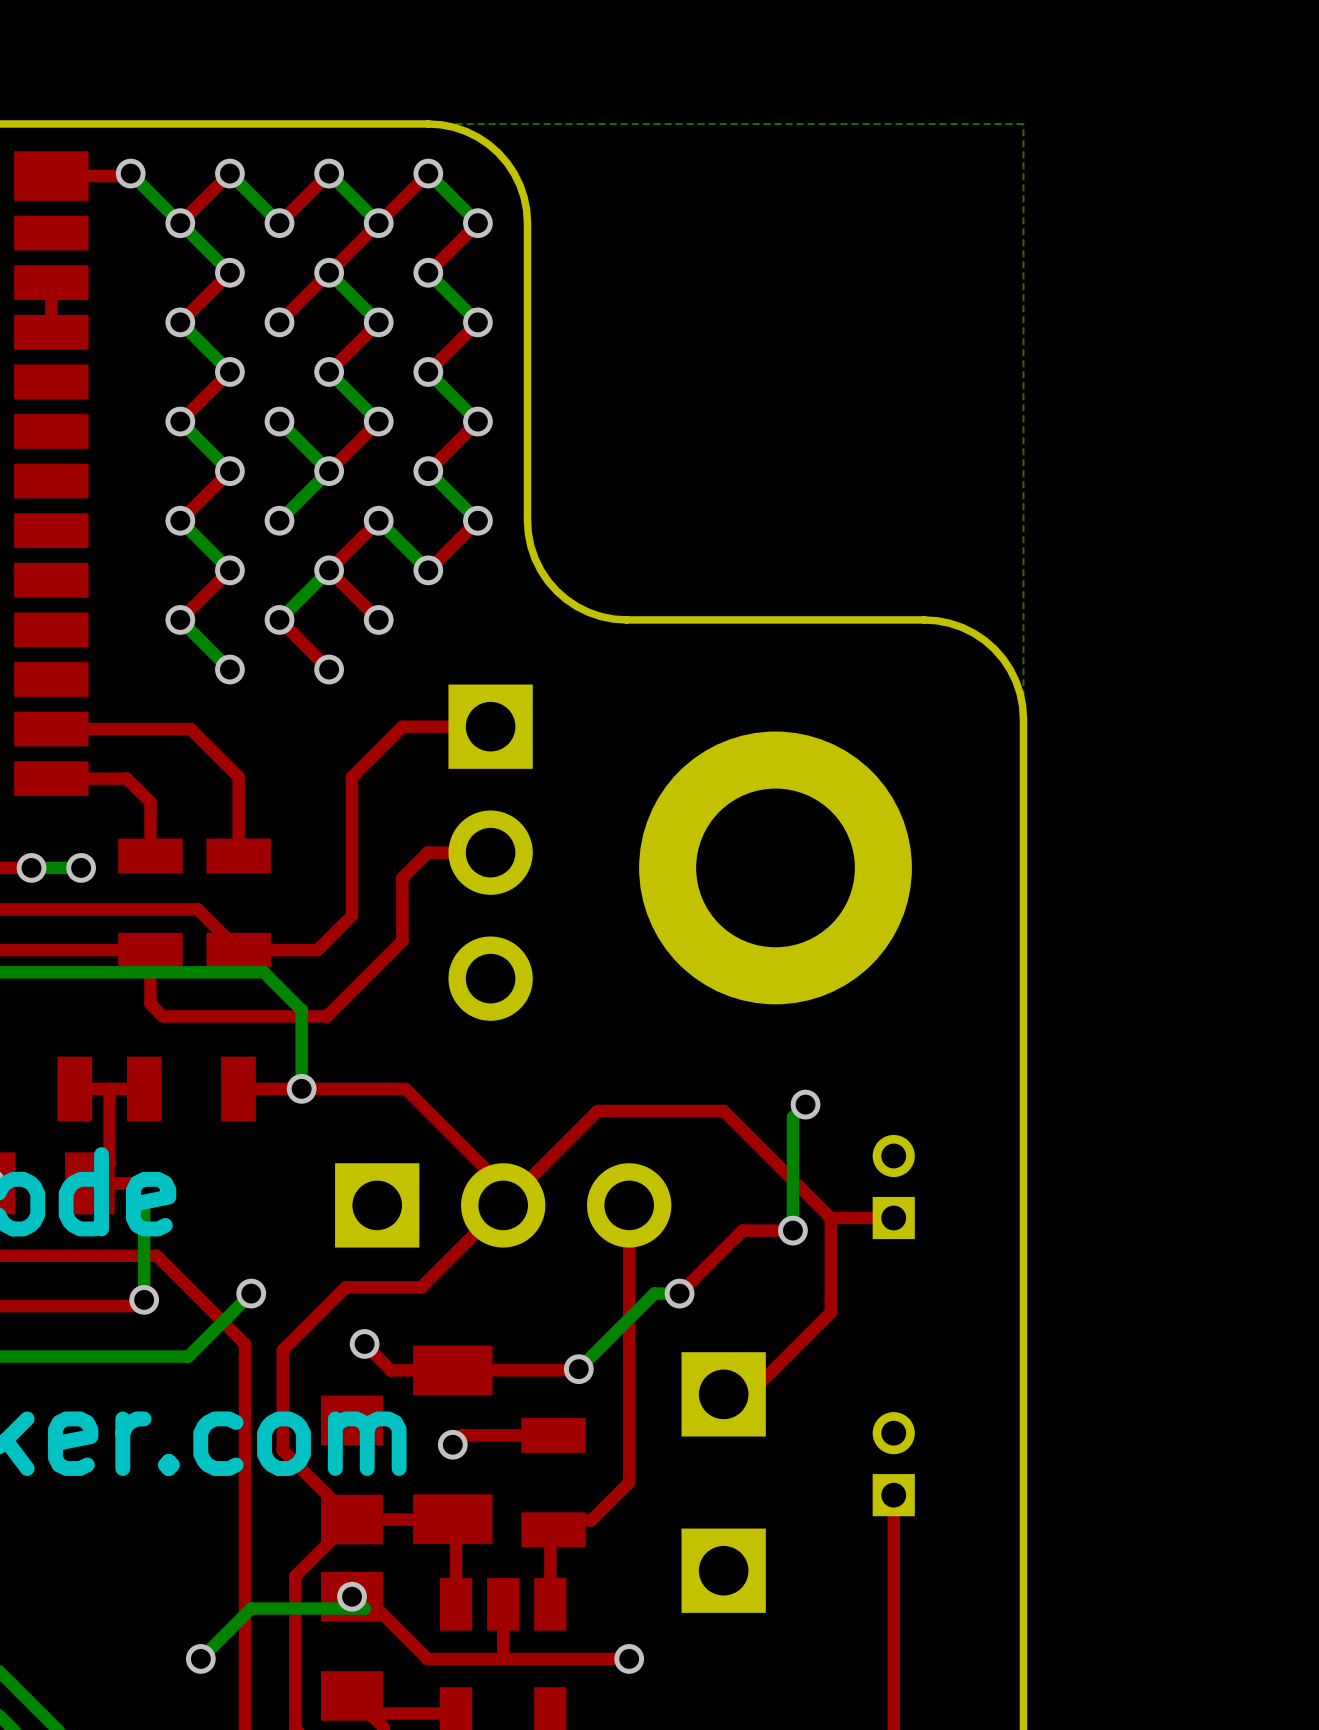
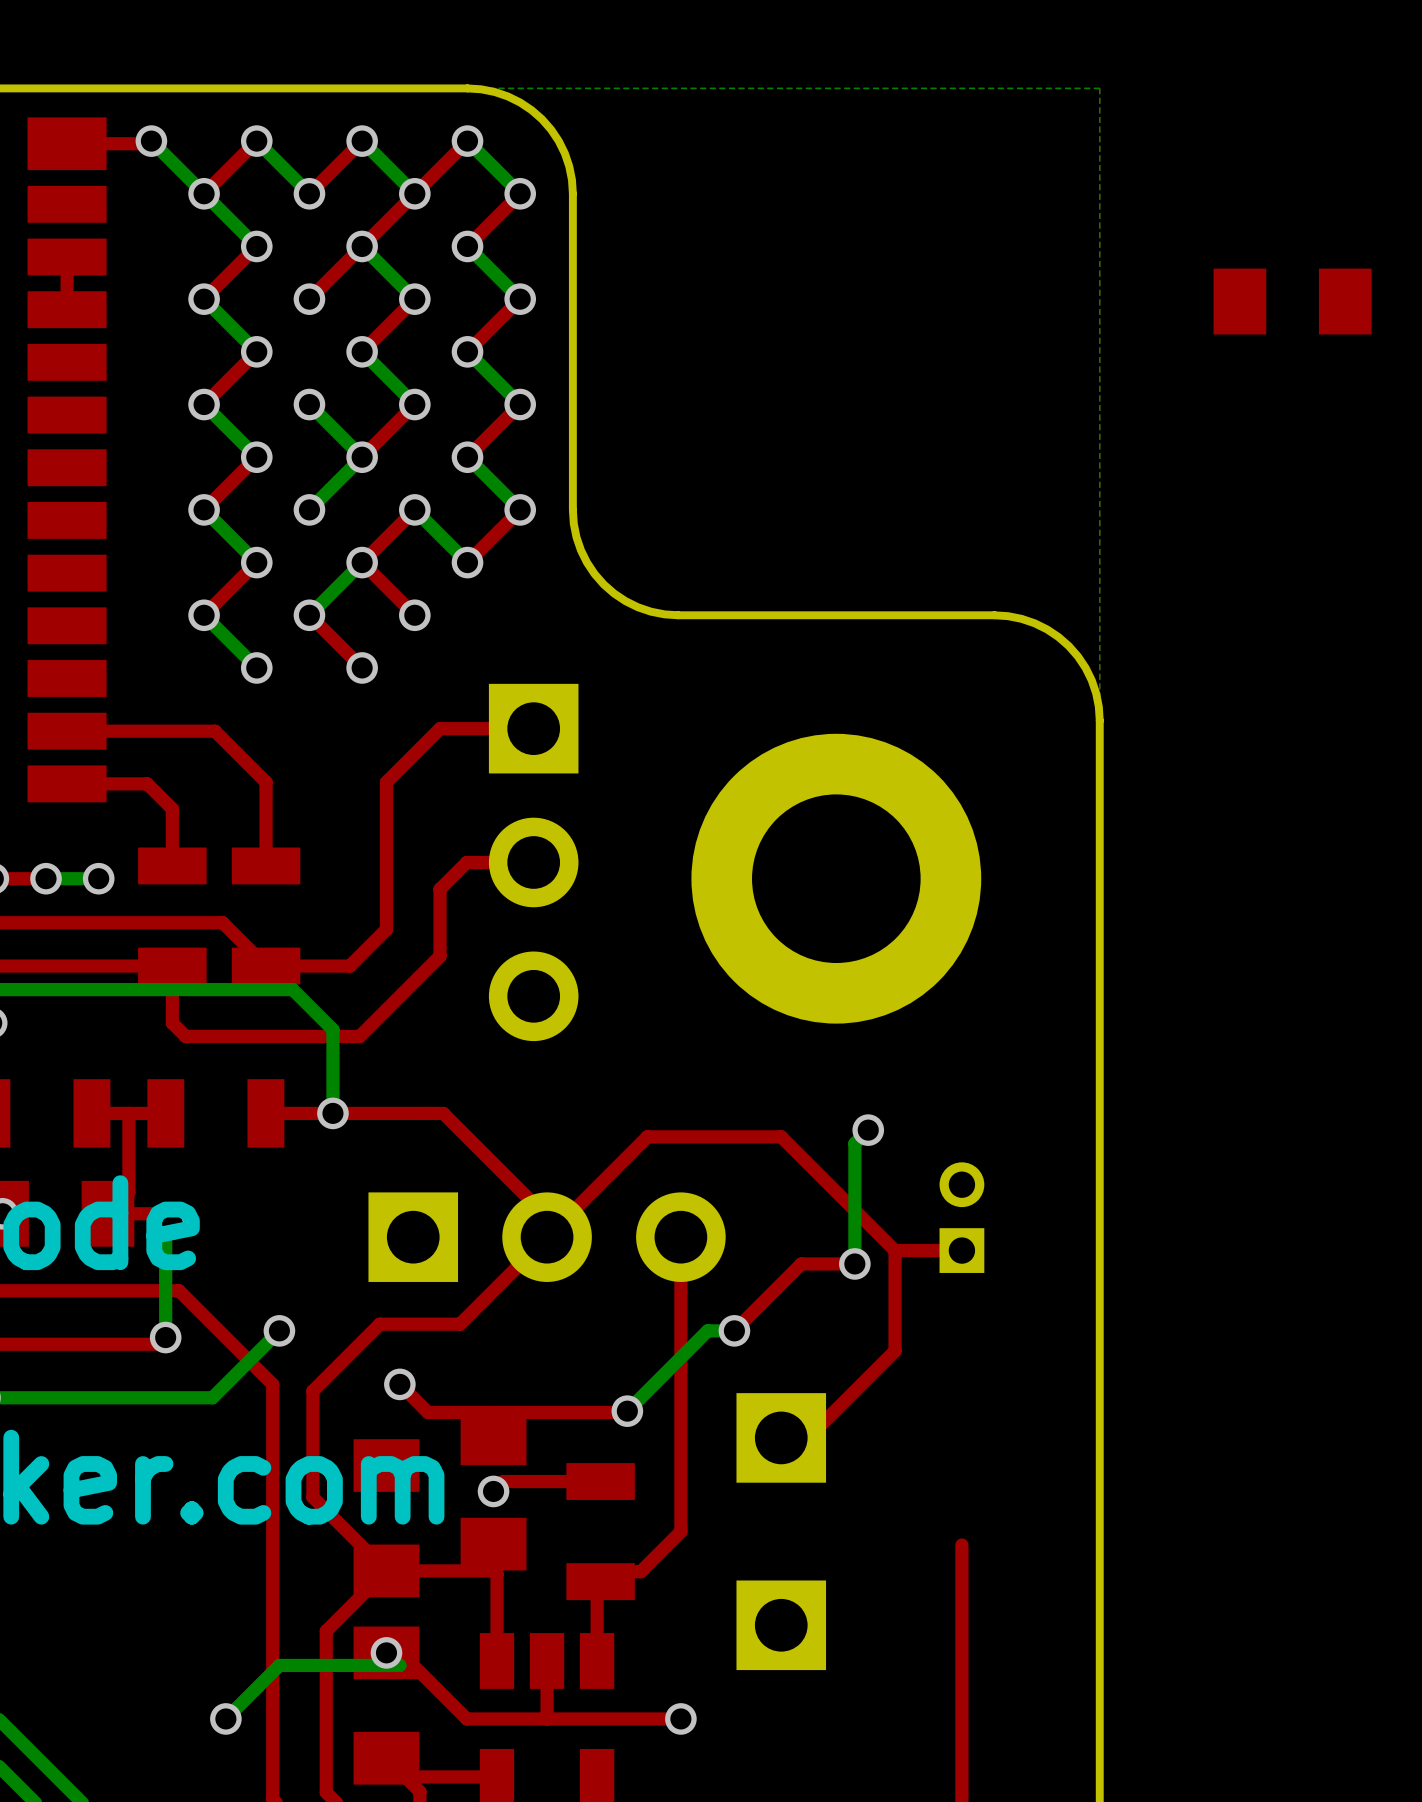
part: none -> (1292, 301)
part footprint: [413, 1345, 493, 1544] -> [460, 1412, 527, 1571]
part: (893, 1464) -> none

